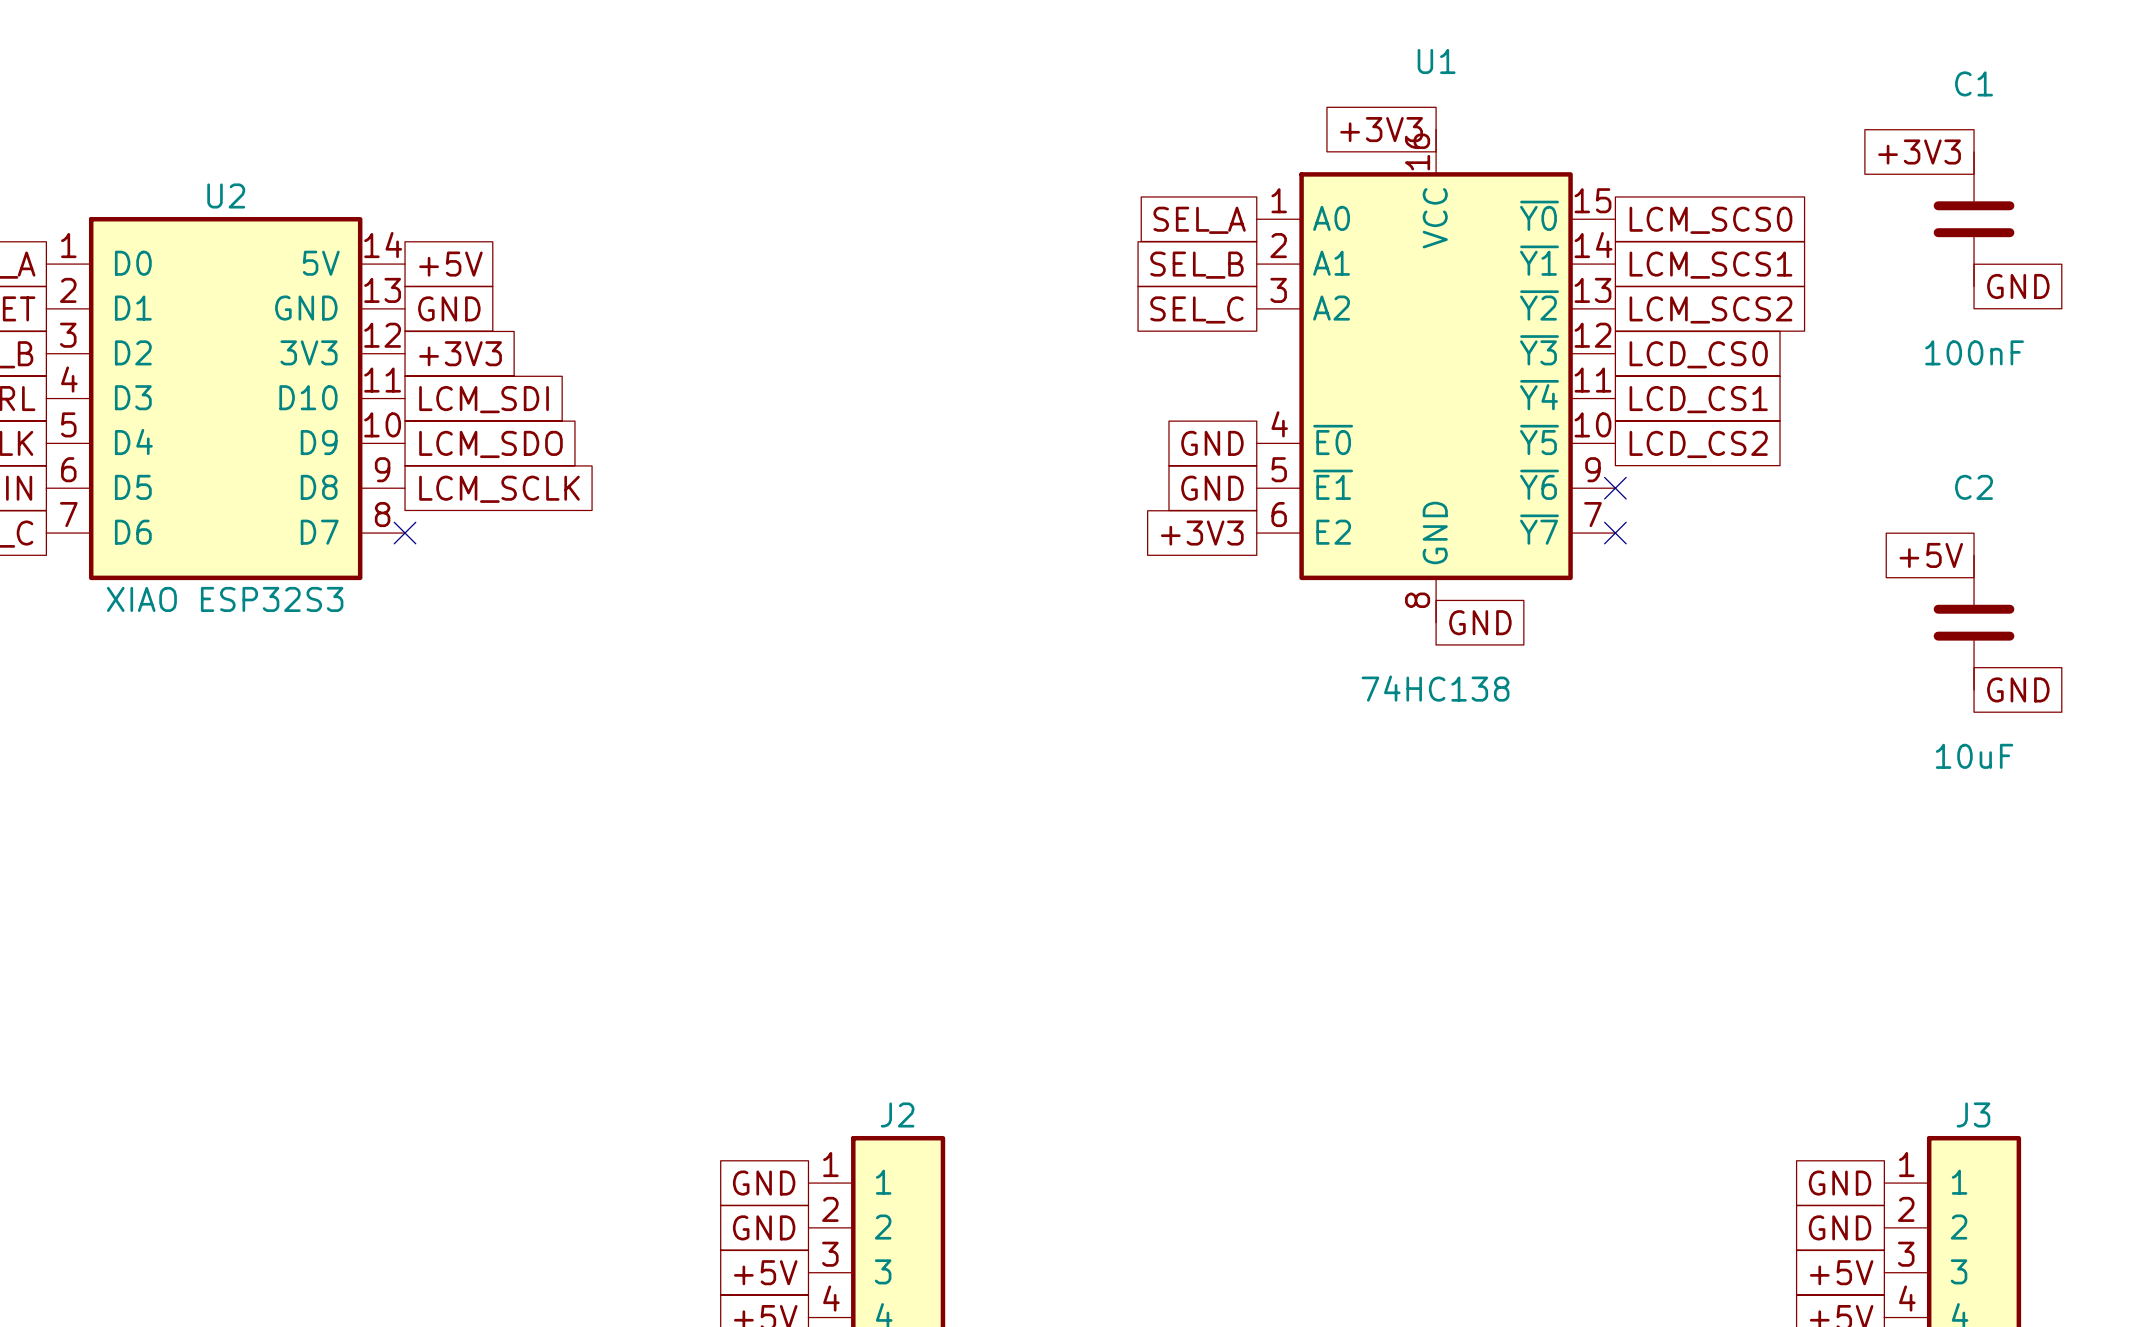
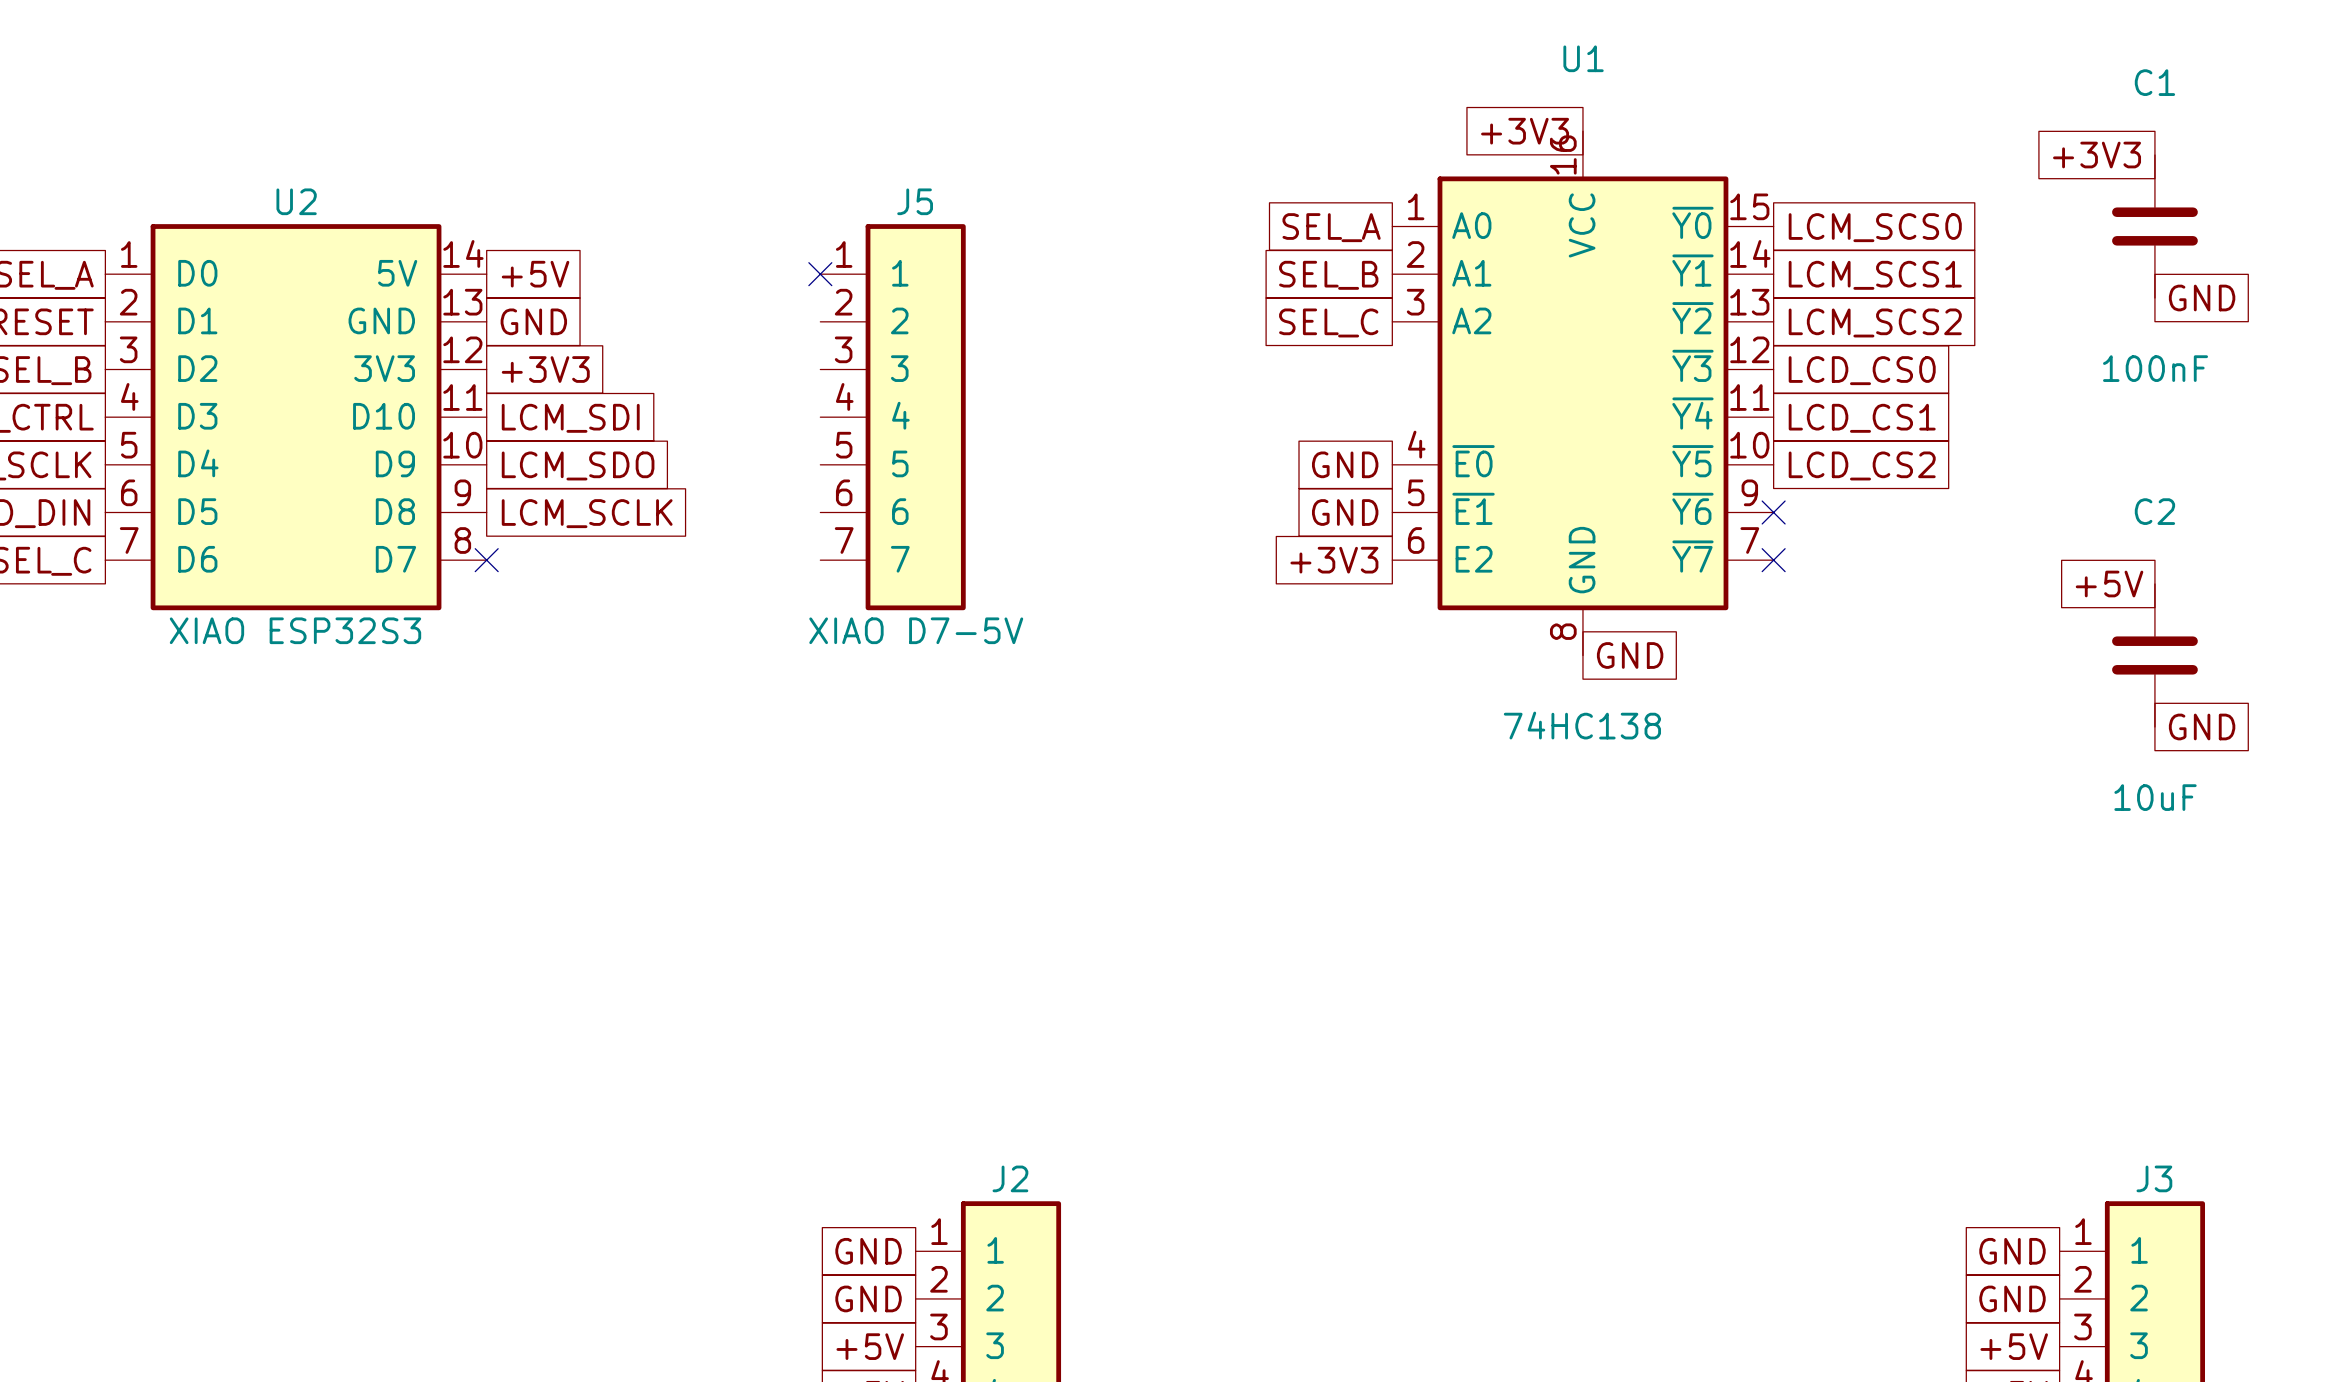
no-connect mark: none -> (820, 274)
J5: none -> XIAO D7-5V (893, 417)

